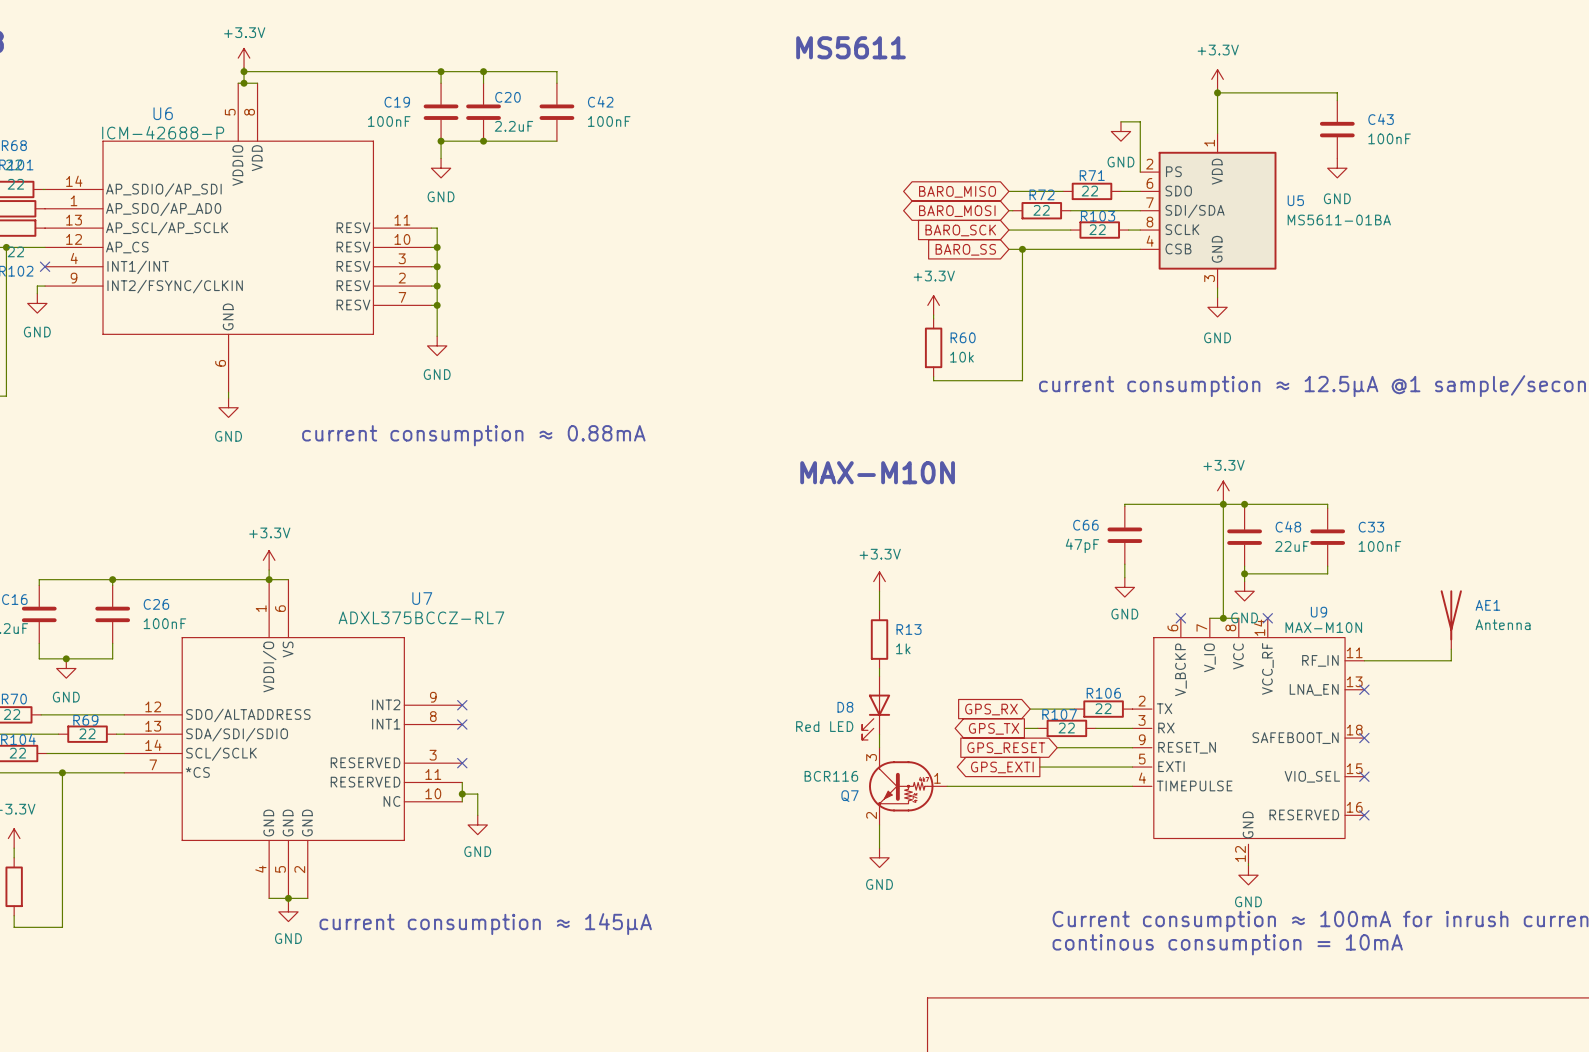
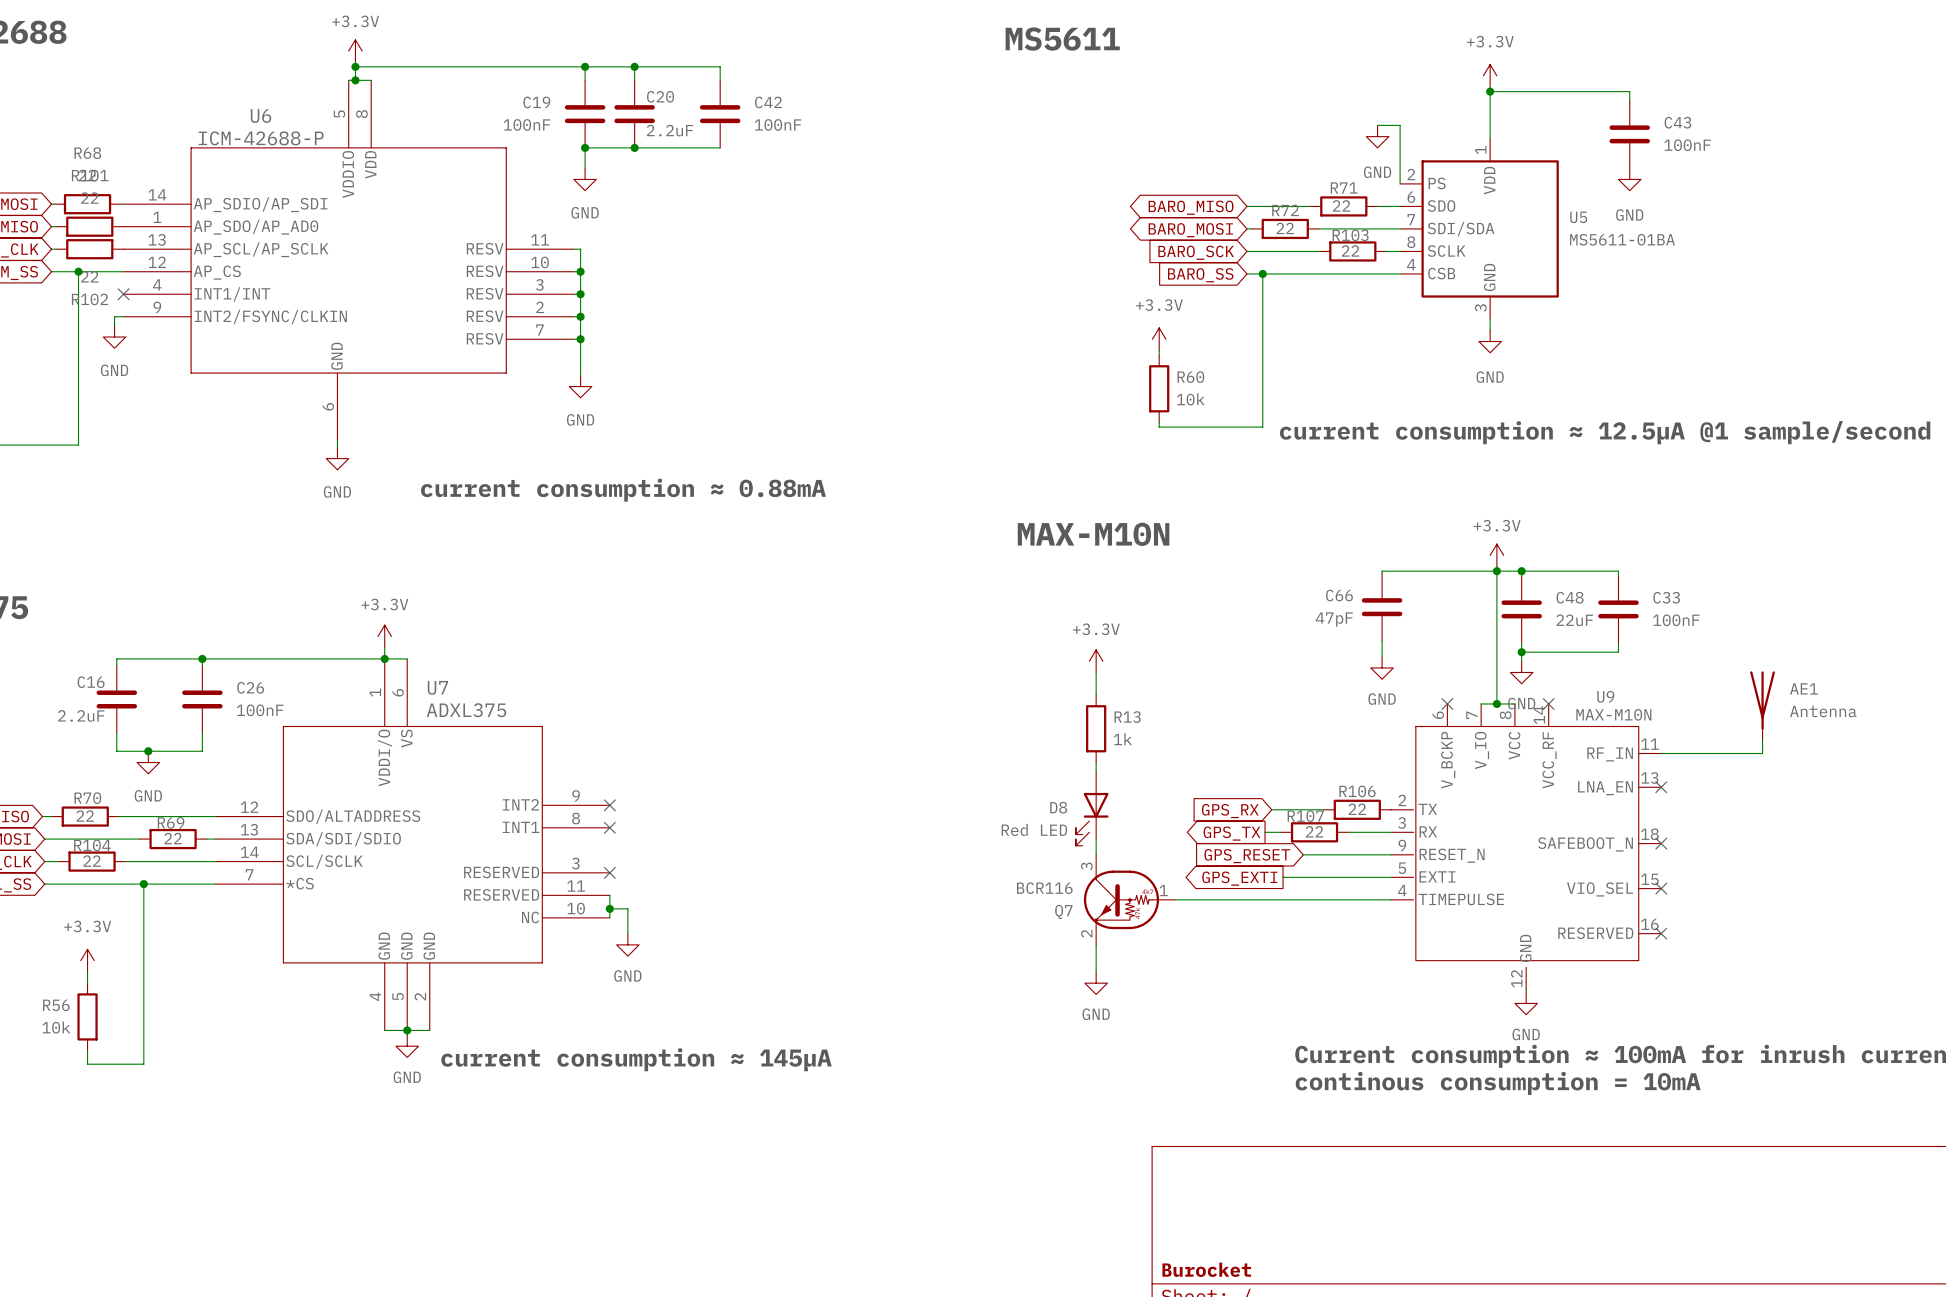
U7 name position: U7 (422, 598) -> U7 (437, 687)
U7 value: ADXL375BCCZ-RL7 (421, 617) -> ADXL375 (466, 710)

